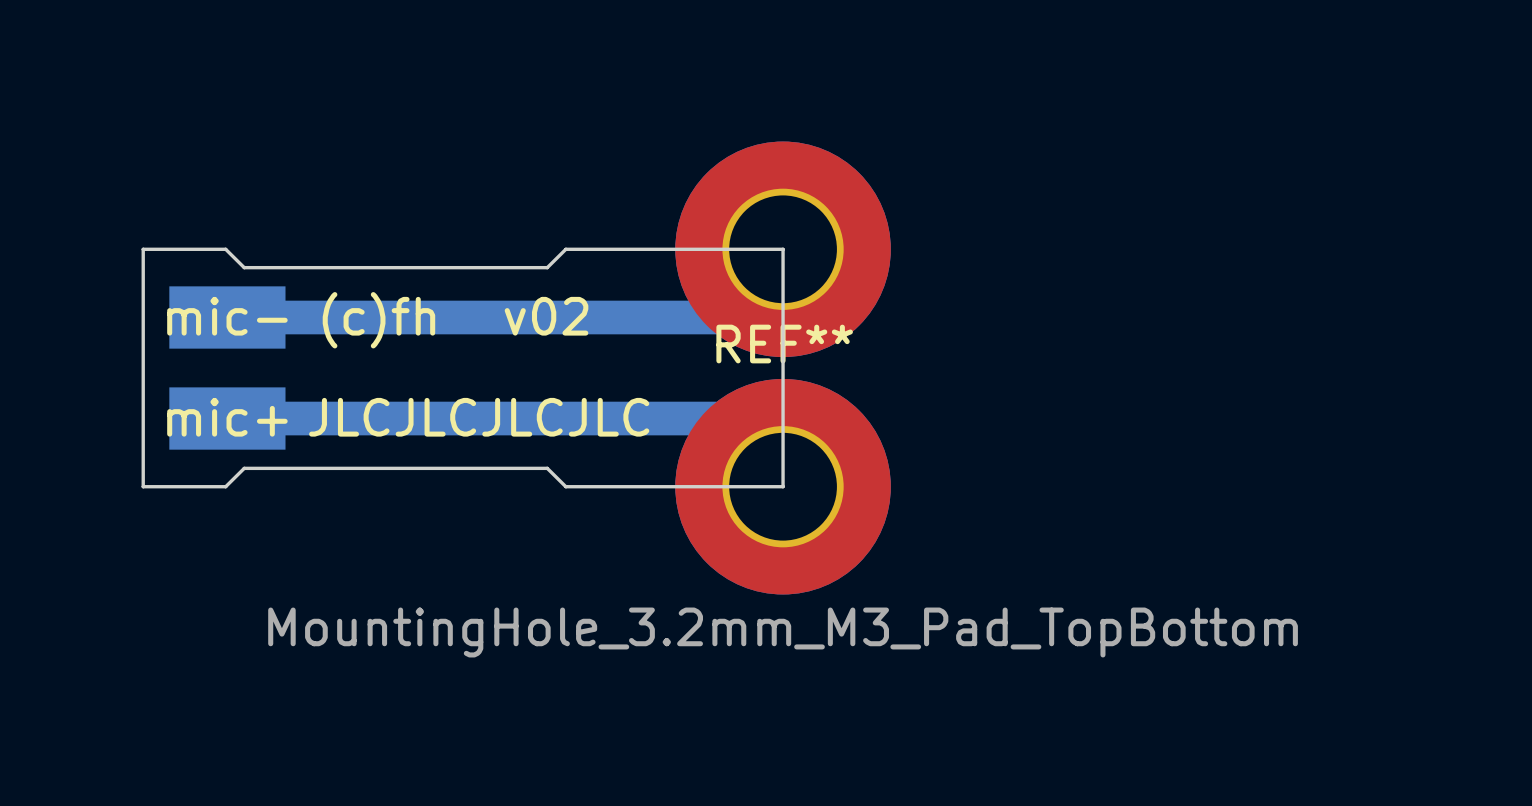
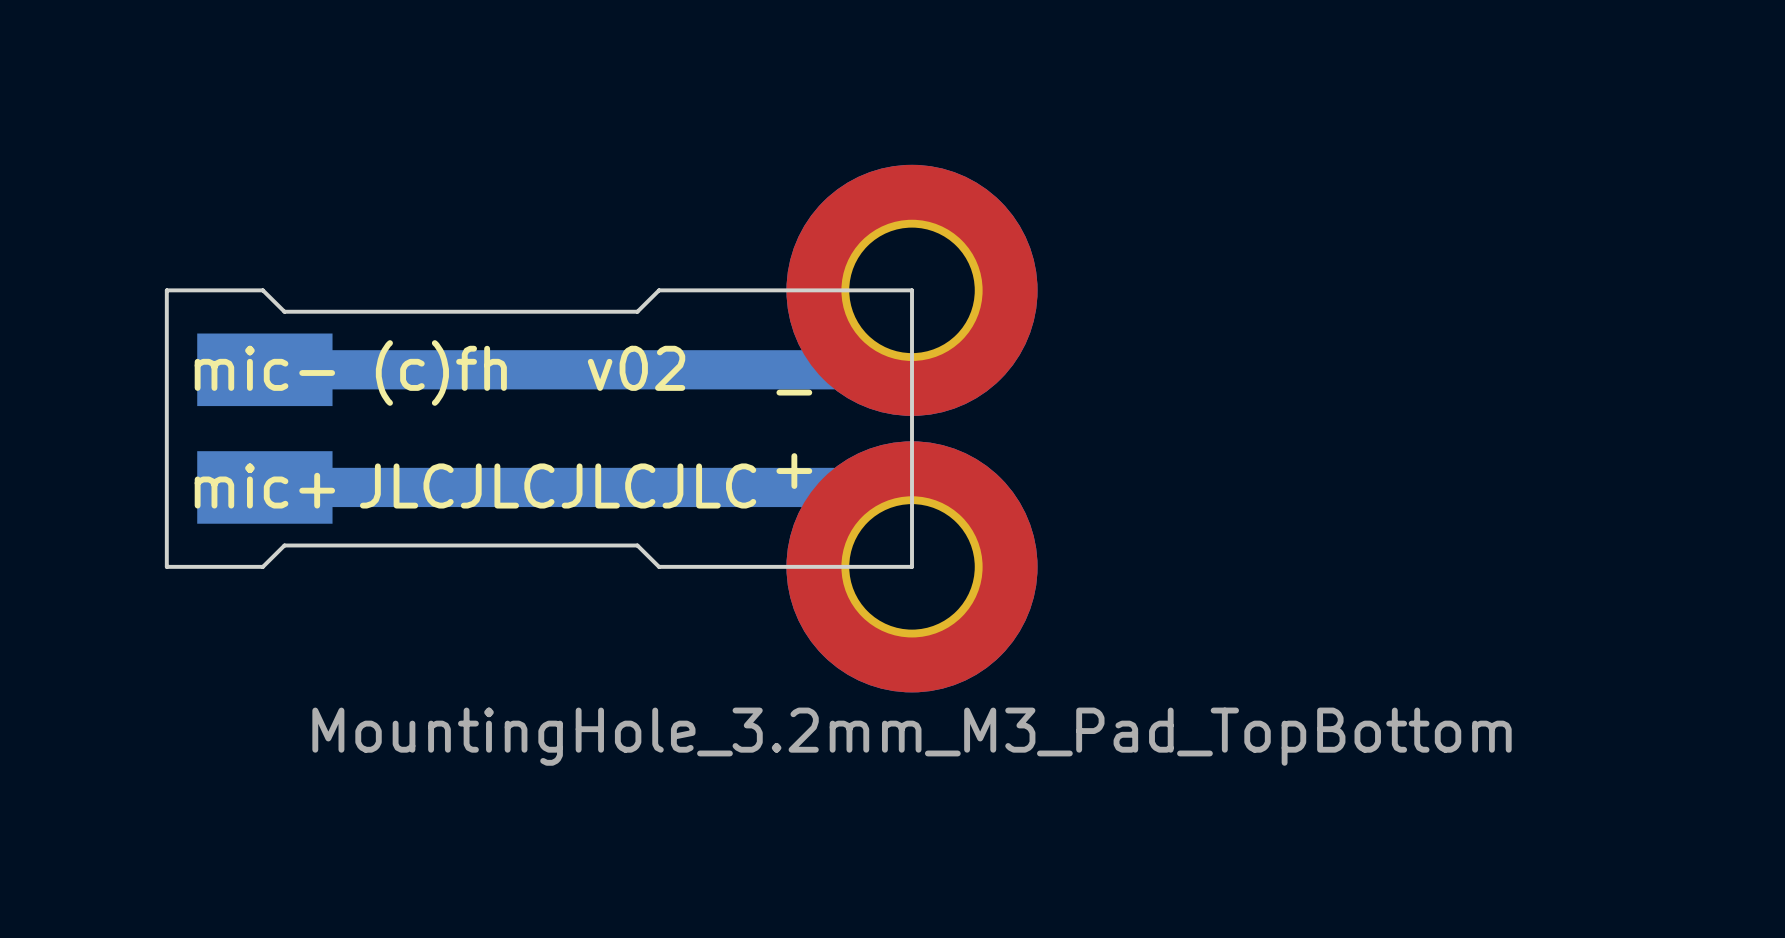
part name: none -> - (794, 392)
REF** name: REF** (784, 344) -> + (794, 471)

